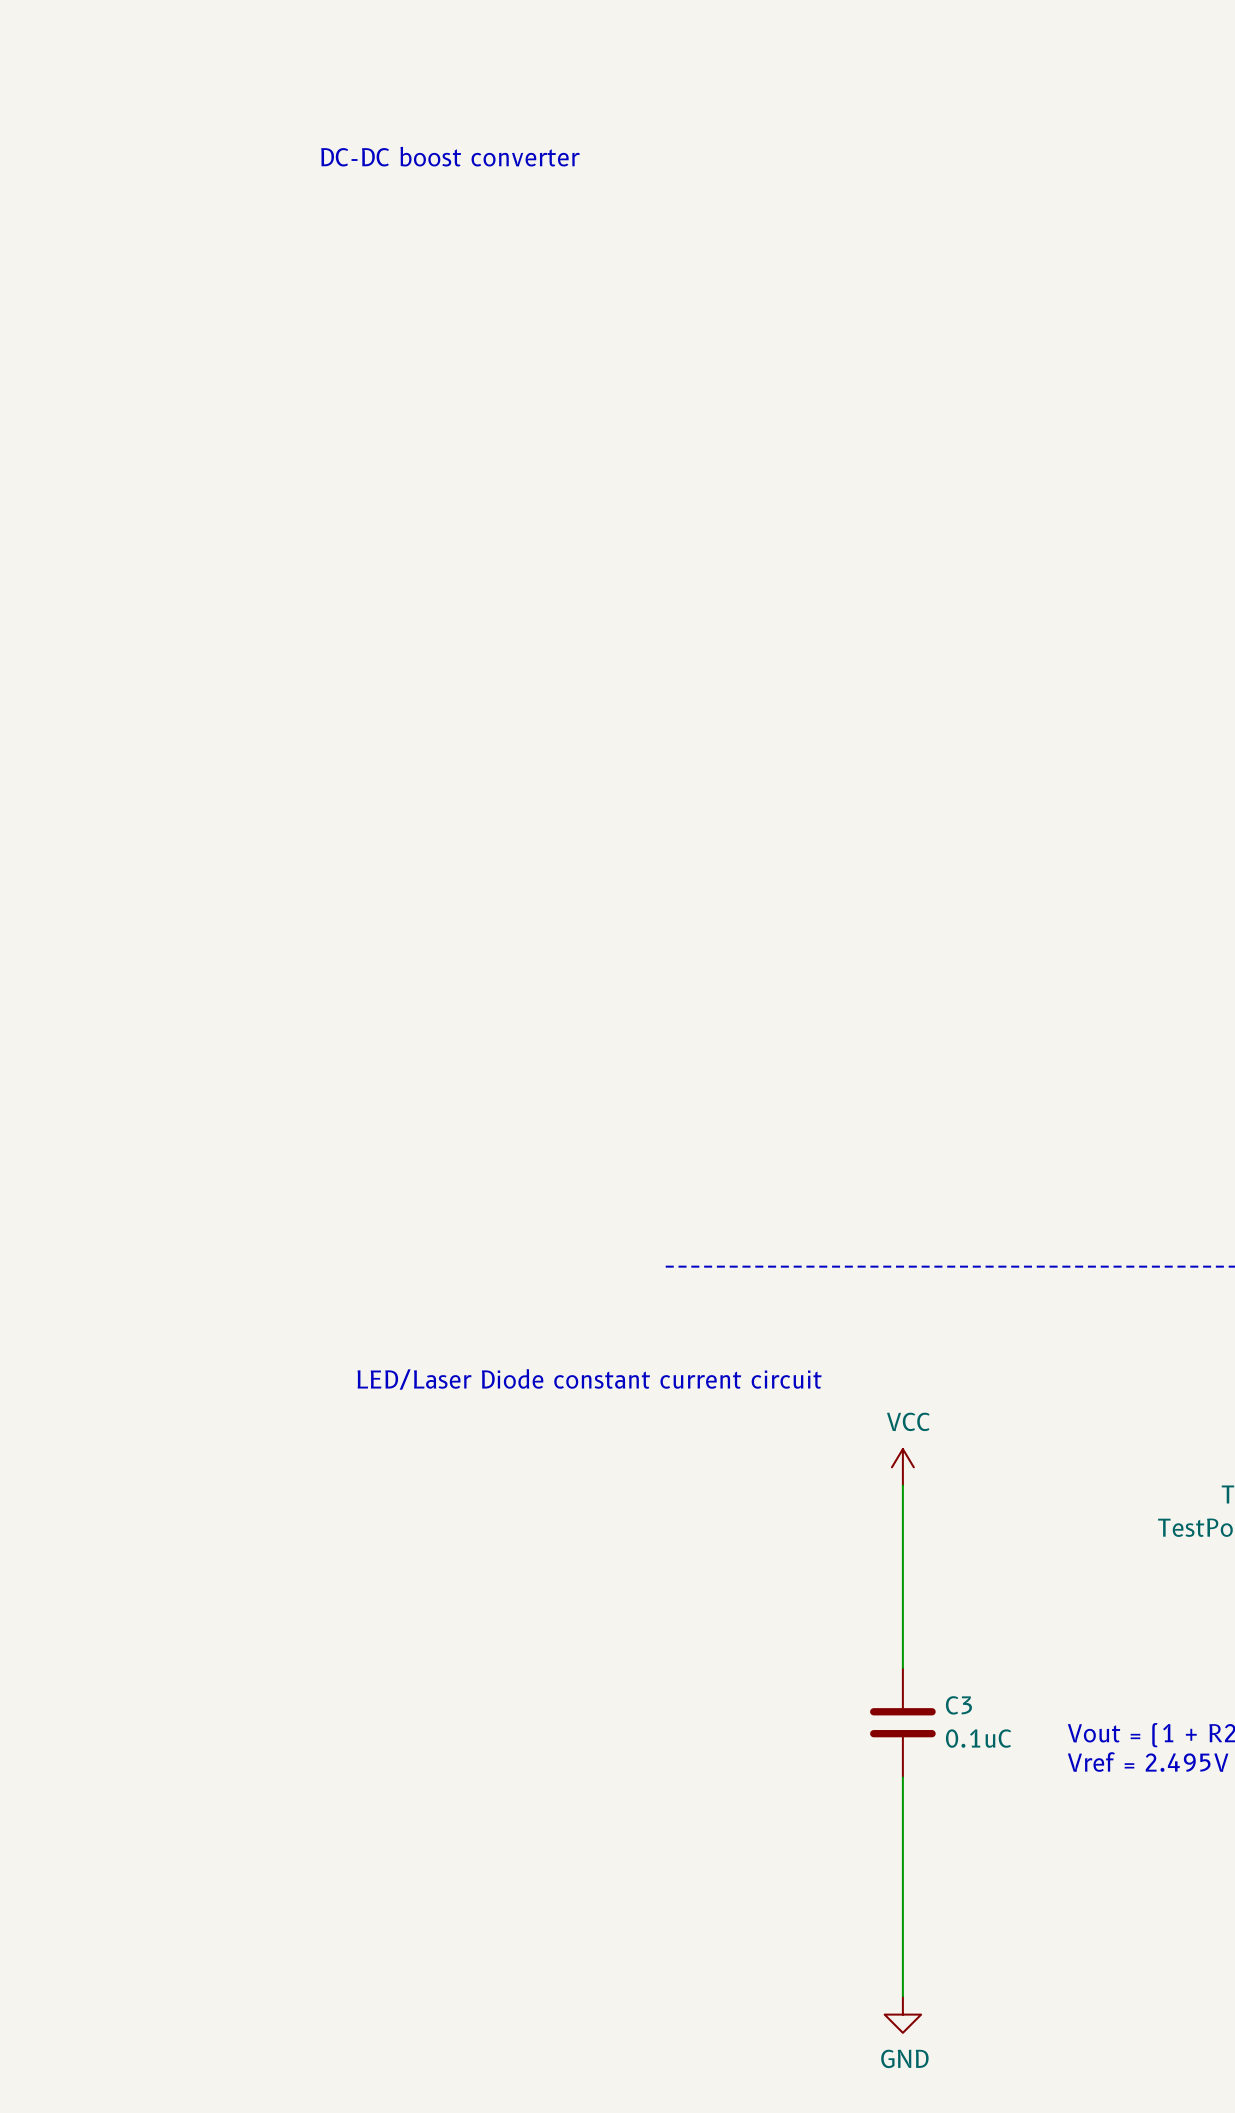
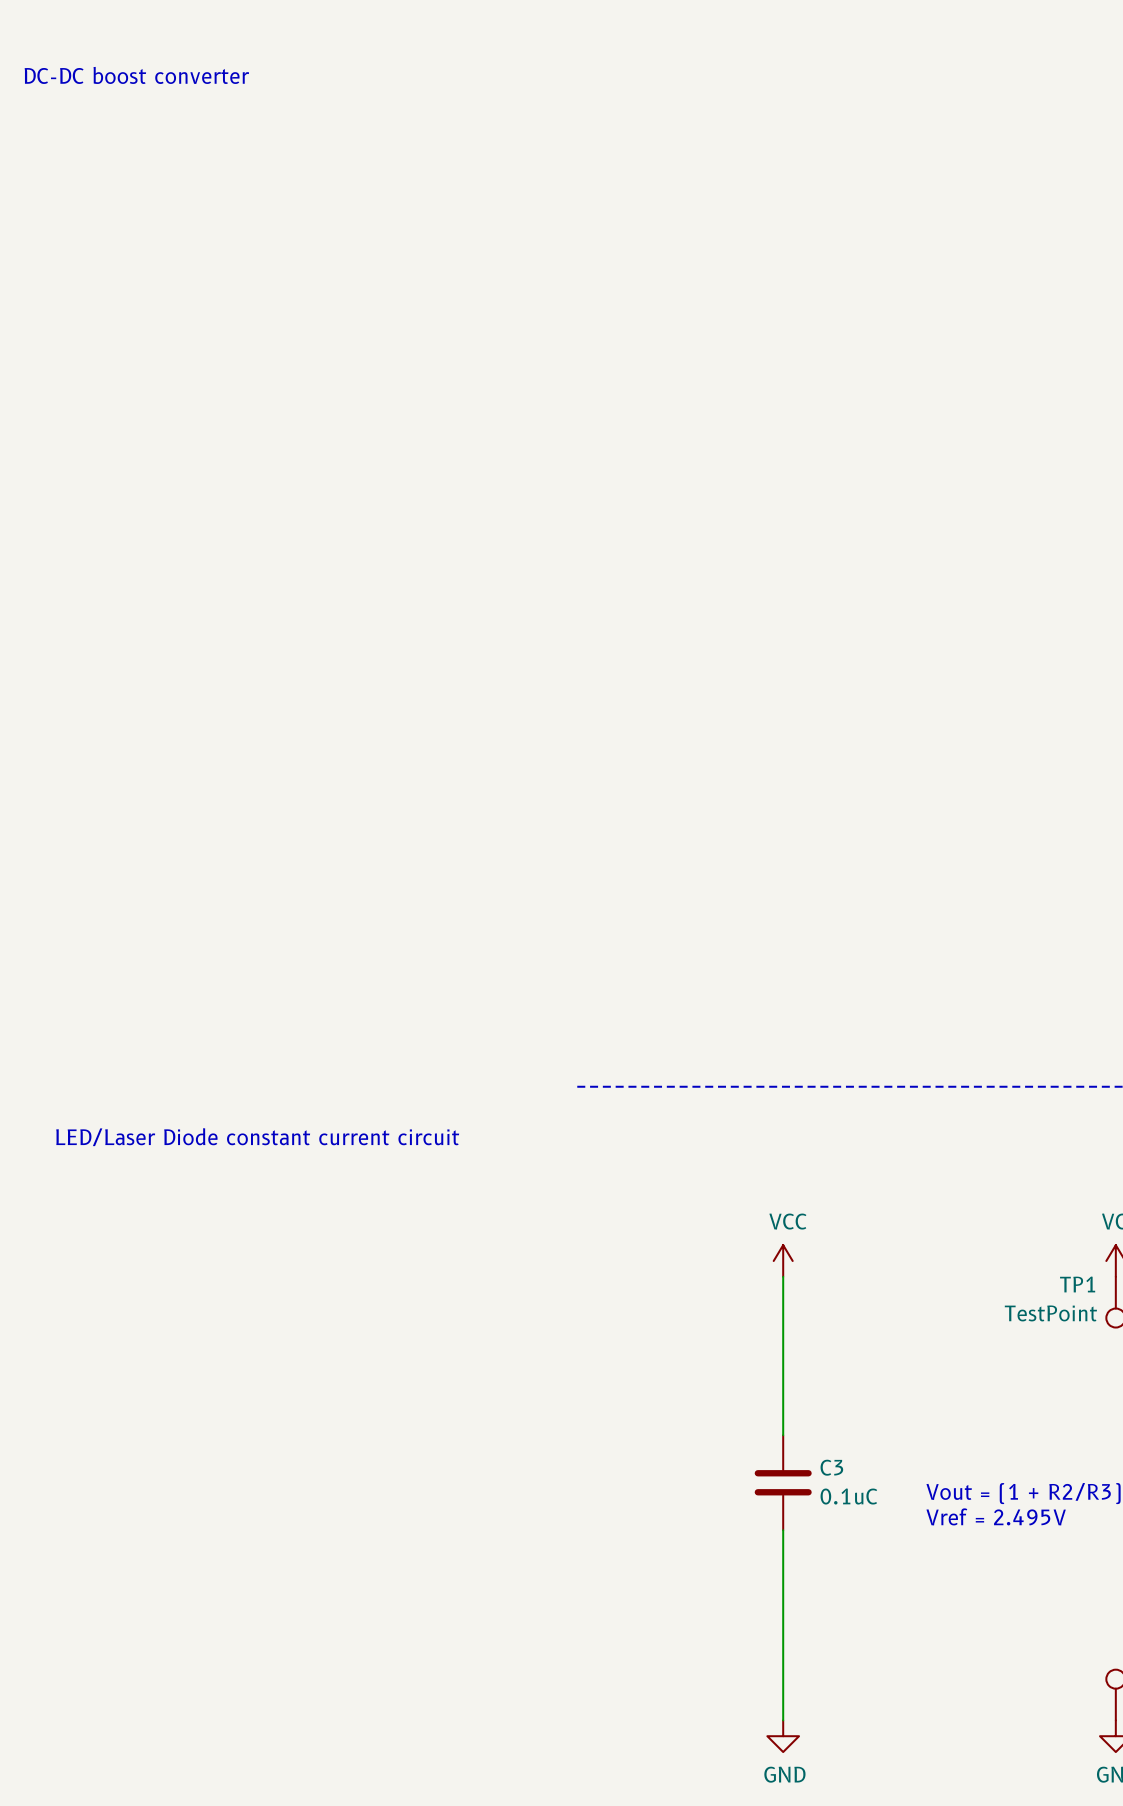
text position: DC-DC boost converter (450, 156) -> DC-DC boost converter (136, 75)
text position: LED/Laser Diode constant current circuit (589, 1379) -> LED/Laser Diode constant current circuit (257, 1137)

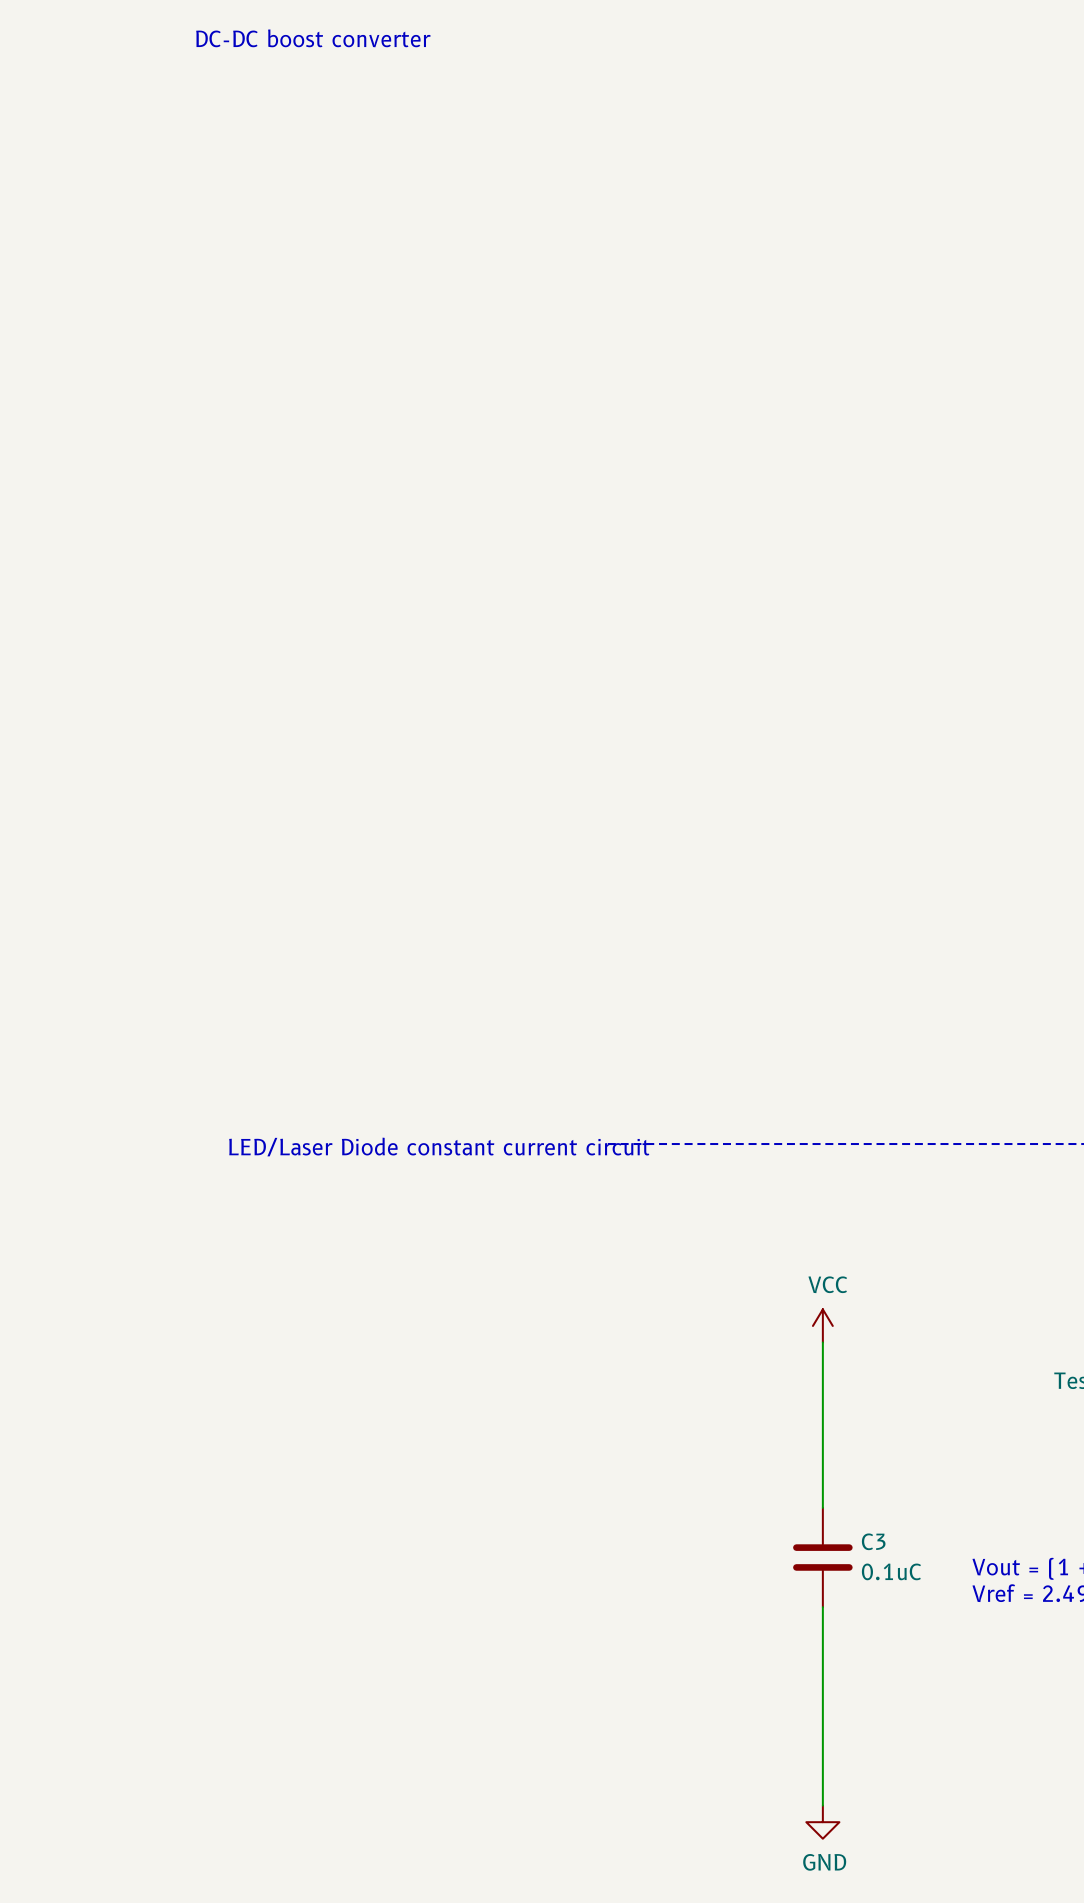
text position: DC-DC boost converter (136, 75) -> DC-DC boost converter (313, 38)
text position: LED/Laser Diode constant current circuit (257, 1137) -> LED/Laser Diode constant current circuit (439, 1147)

